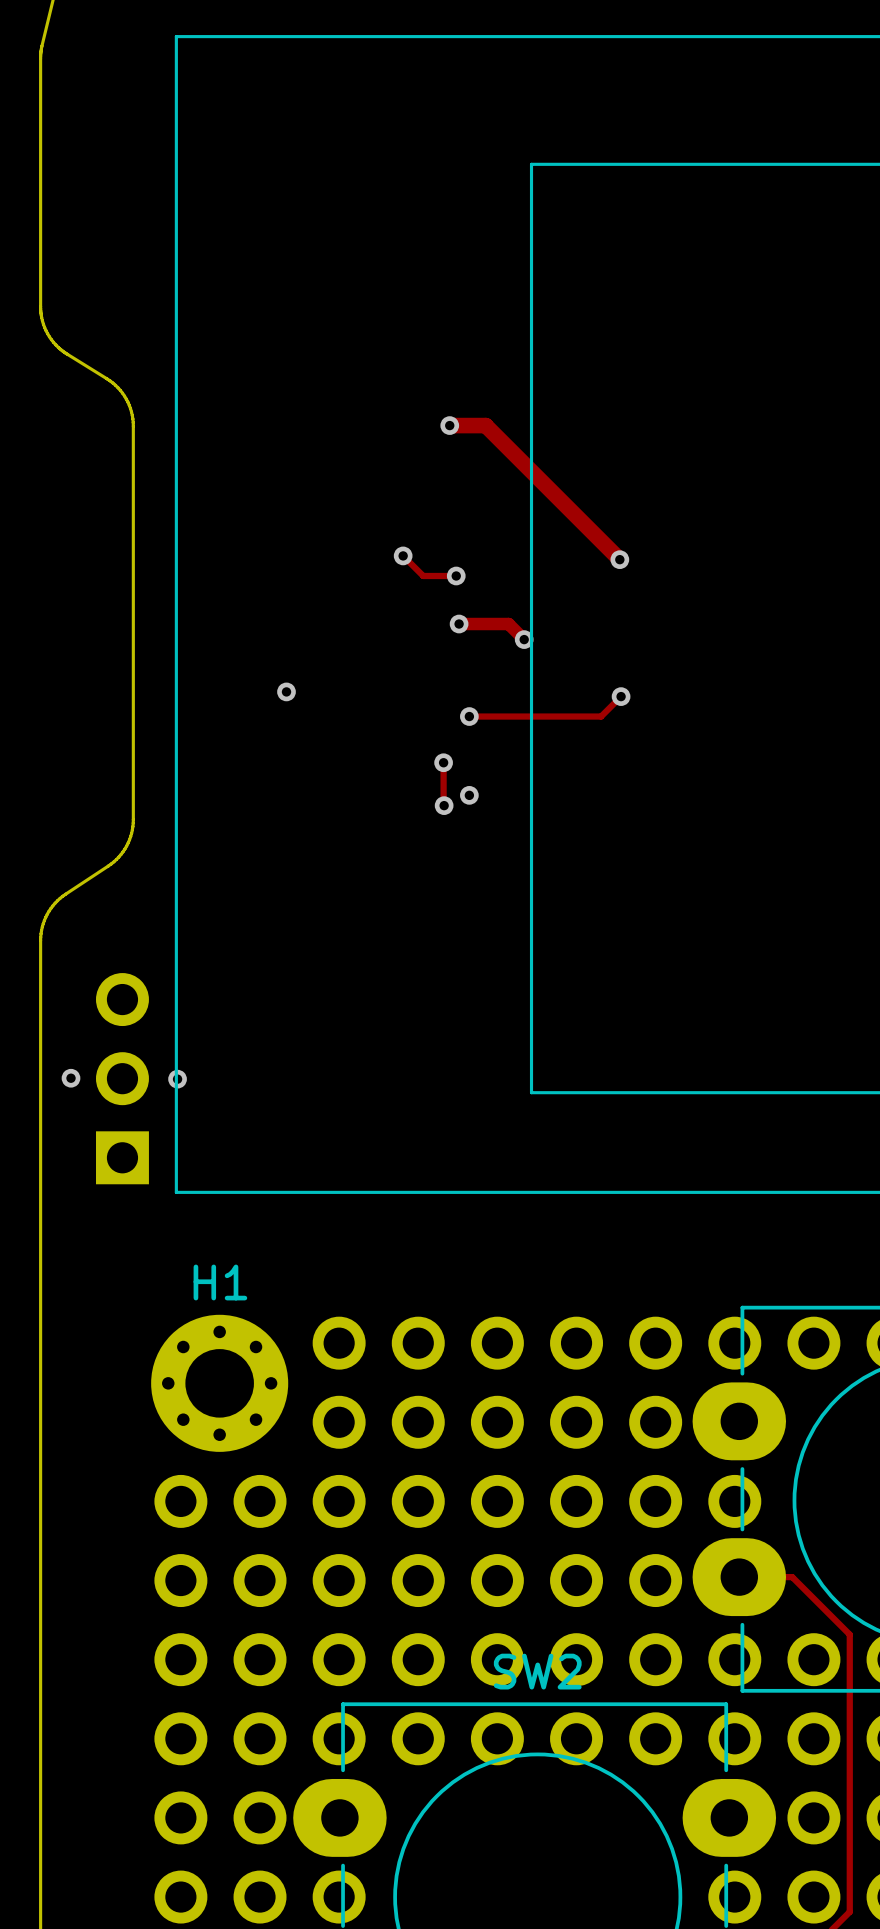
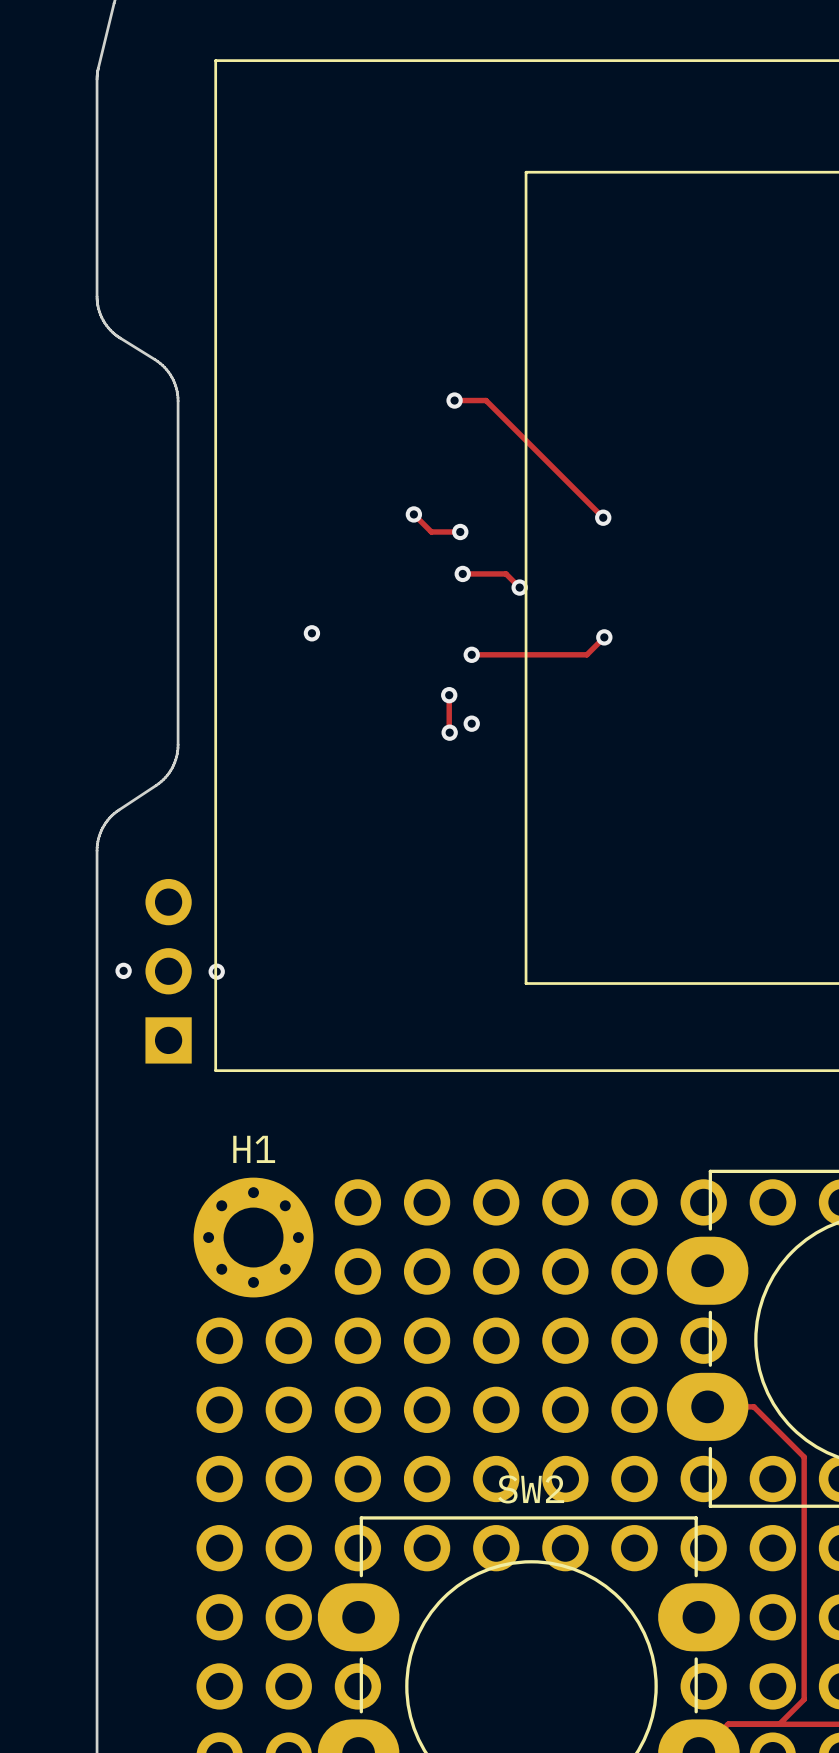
track width: thick (449, 425) (485, 425) (619, 559) -> thin (454, 400) (486, 400) (603, 517)
track width: thick (459, 624) (508, 624) (524, 639) -> thin (462, 573) (506, 573) (519, 587)

